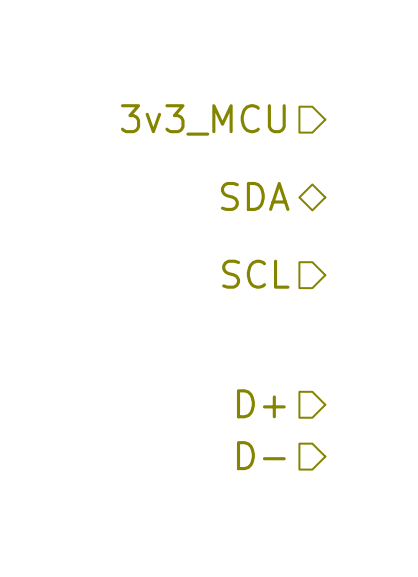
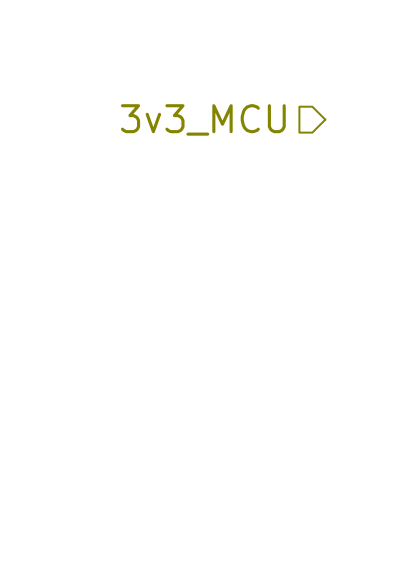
hierarchical label: SDA (255, 196) -> none
hierarchical label: SCL (255, 274) -> none
hierarchical label: D+ (261, 403) -> none
hierarchical label: D- (261, 455) -> none

